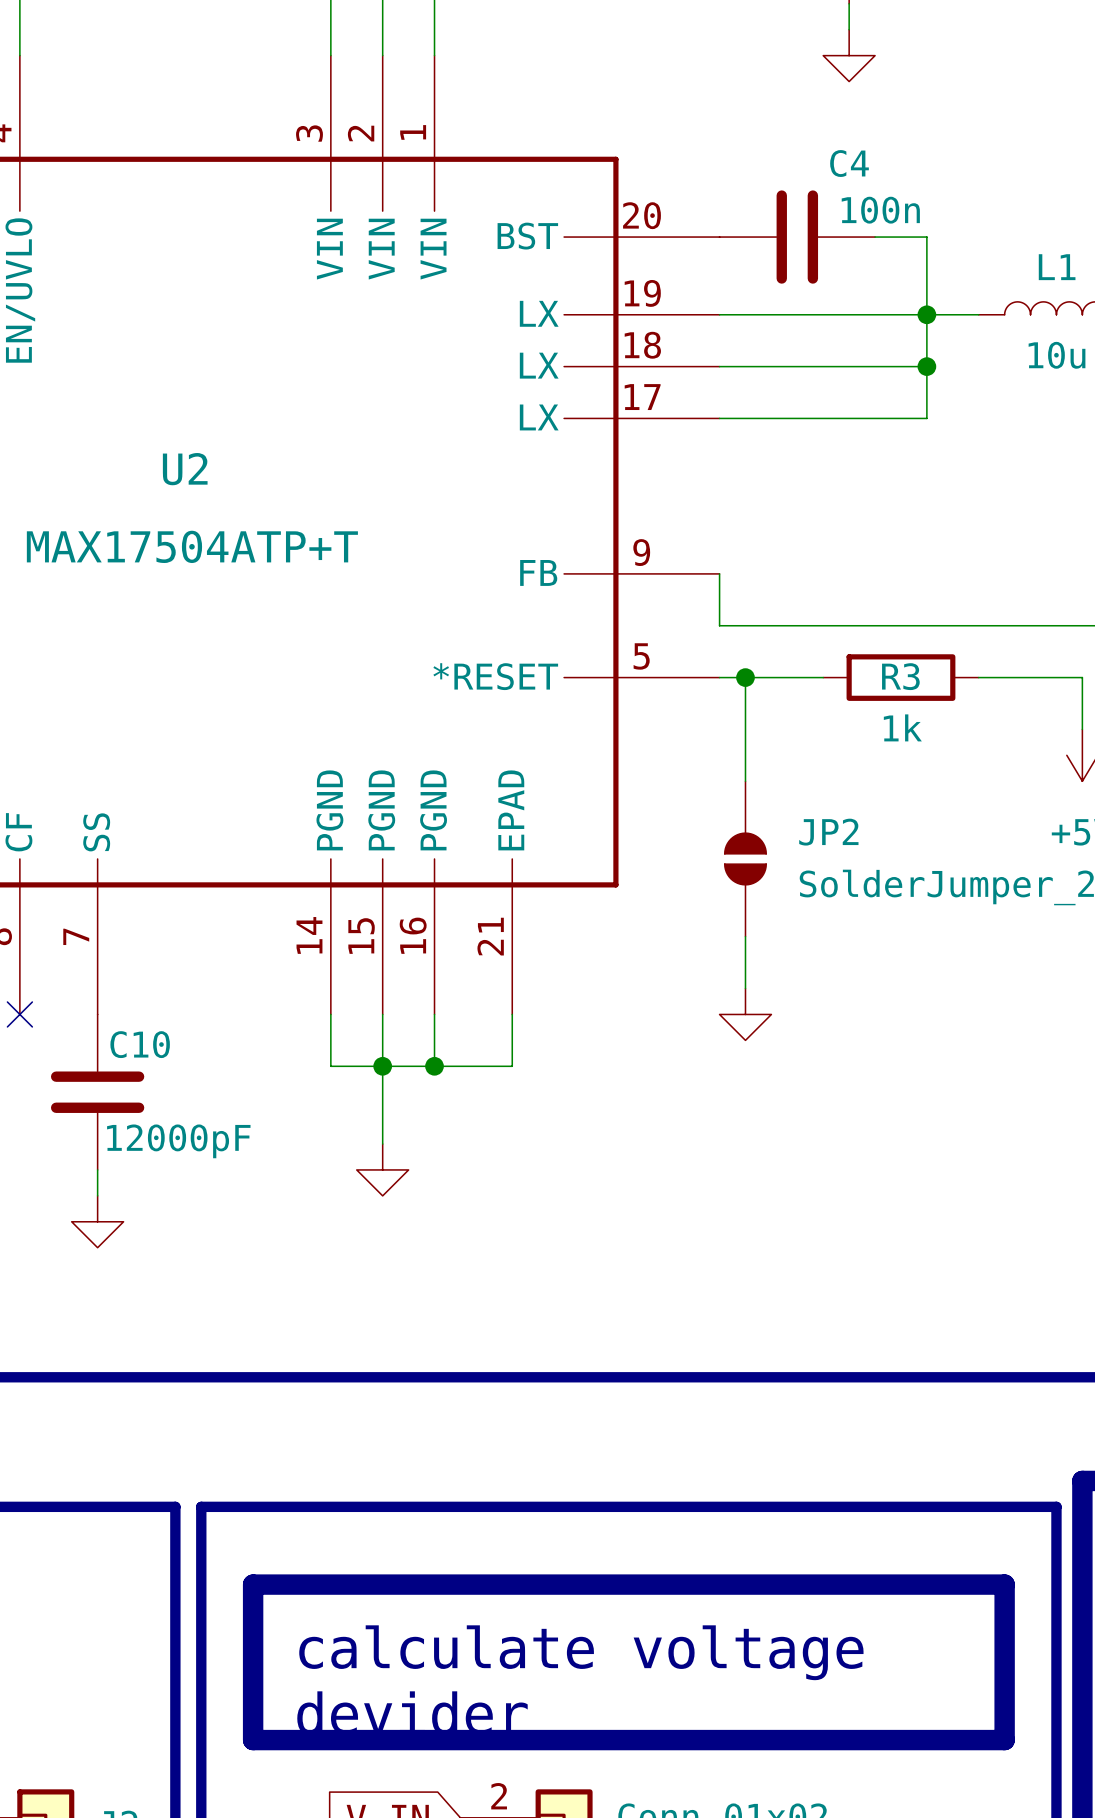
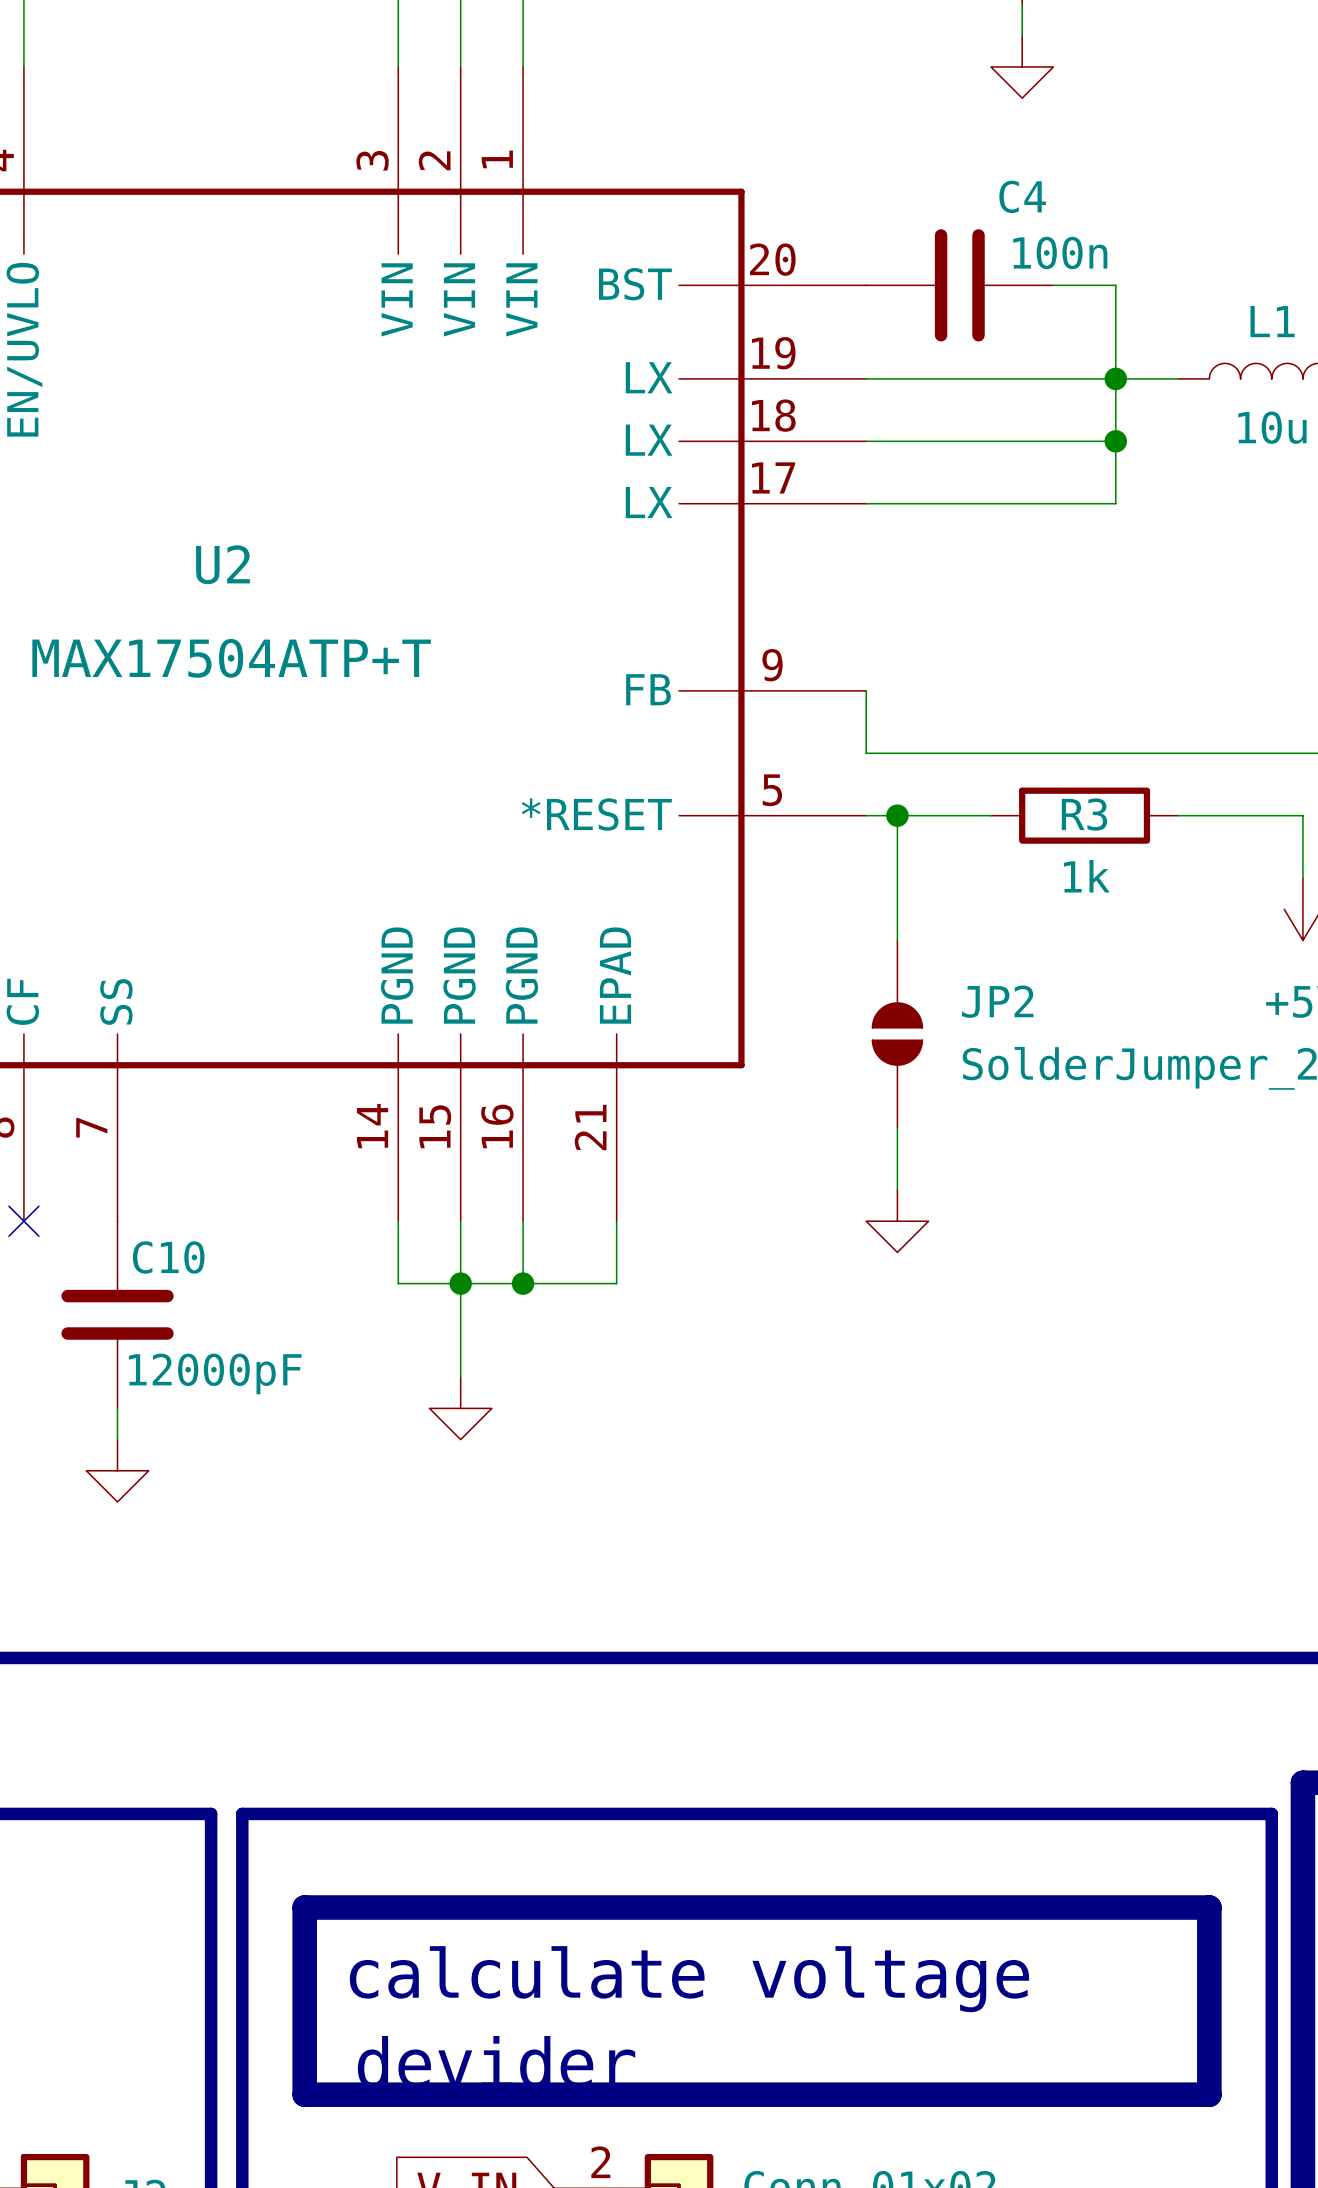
text position: calculate voltage (581, 1652) -> calculate voltage (689, 1979)

